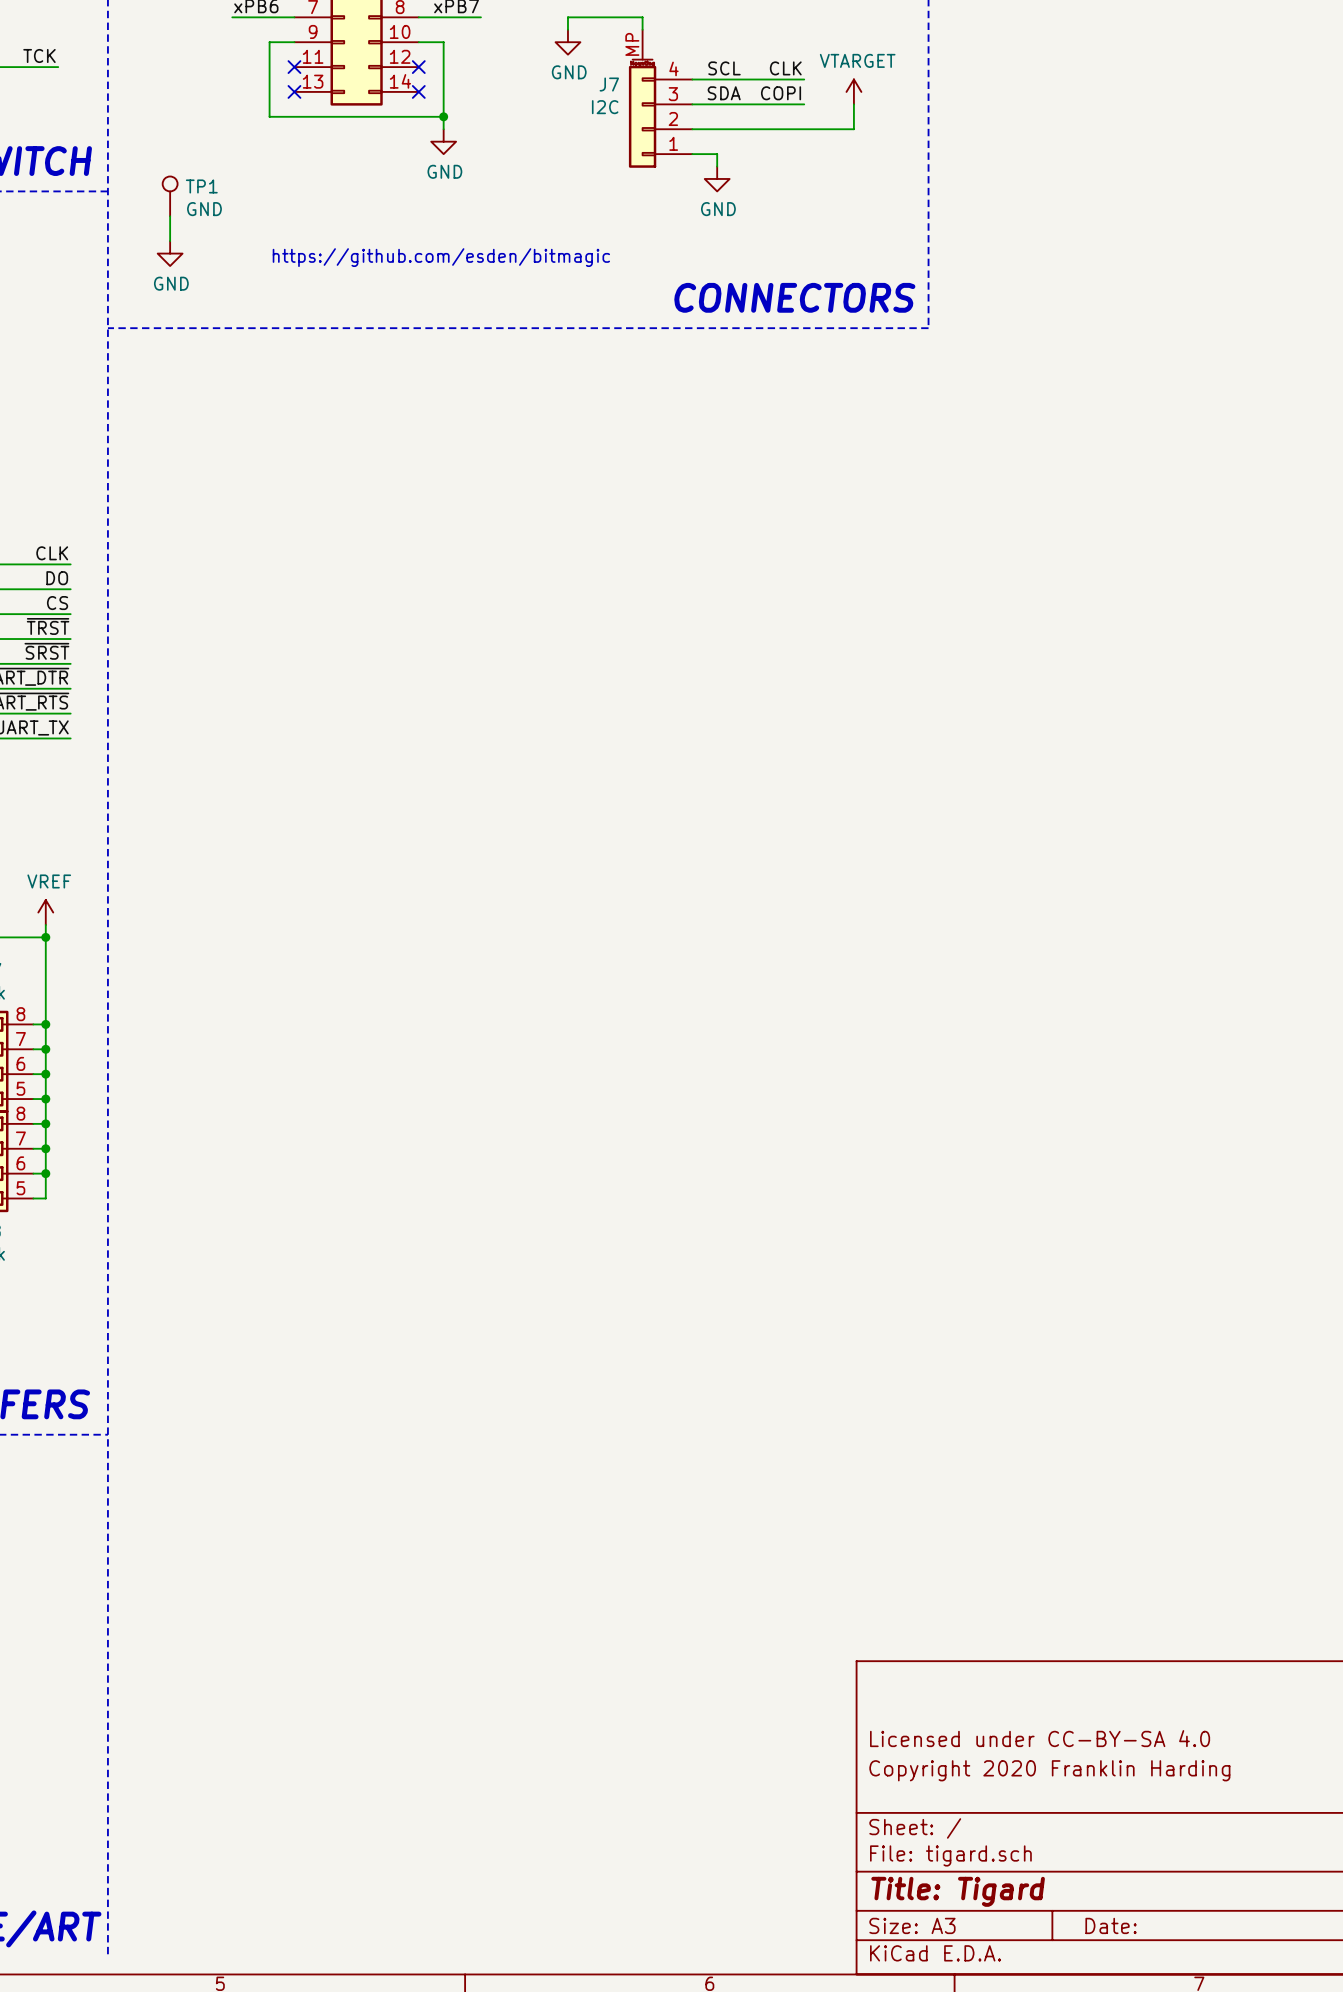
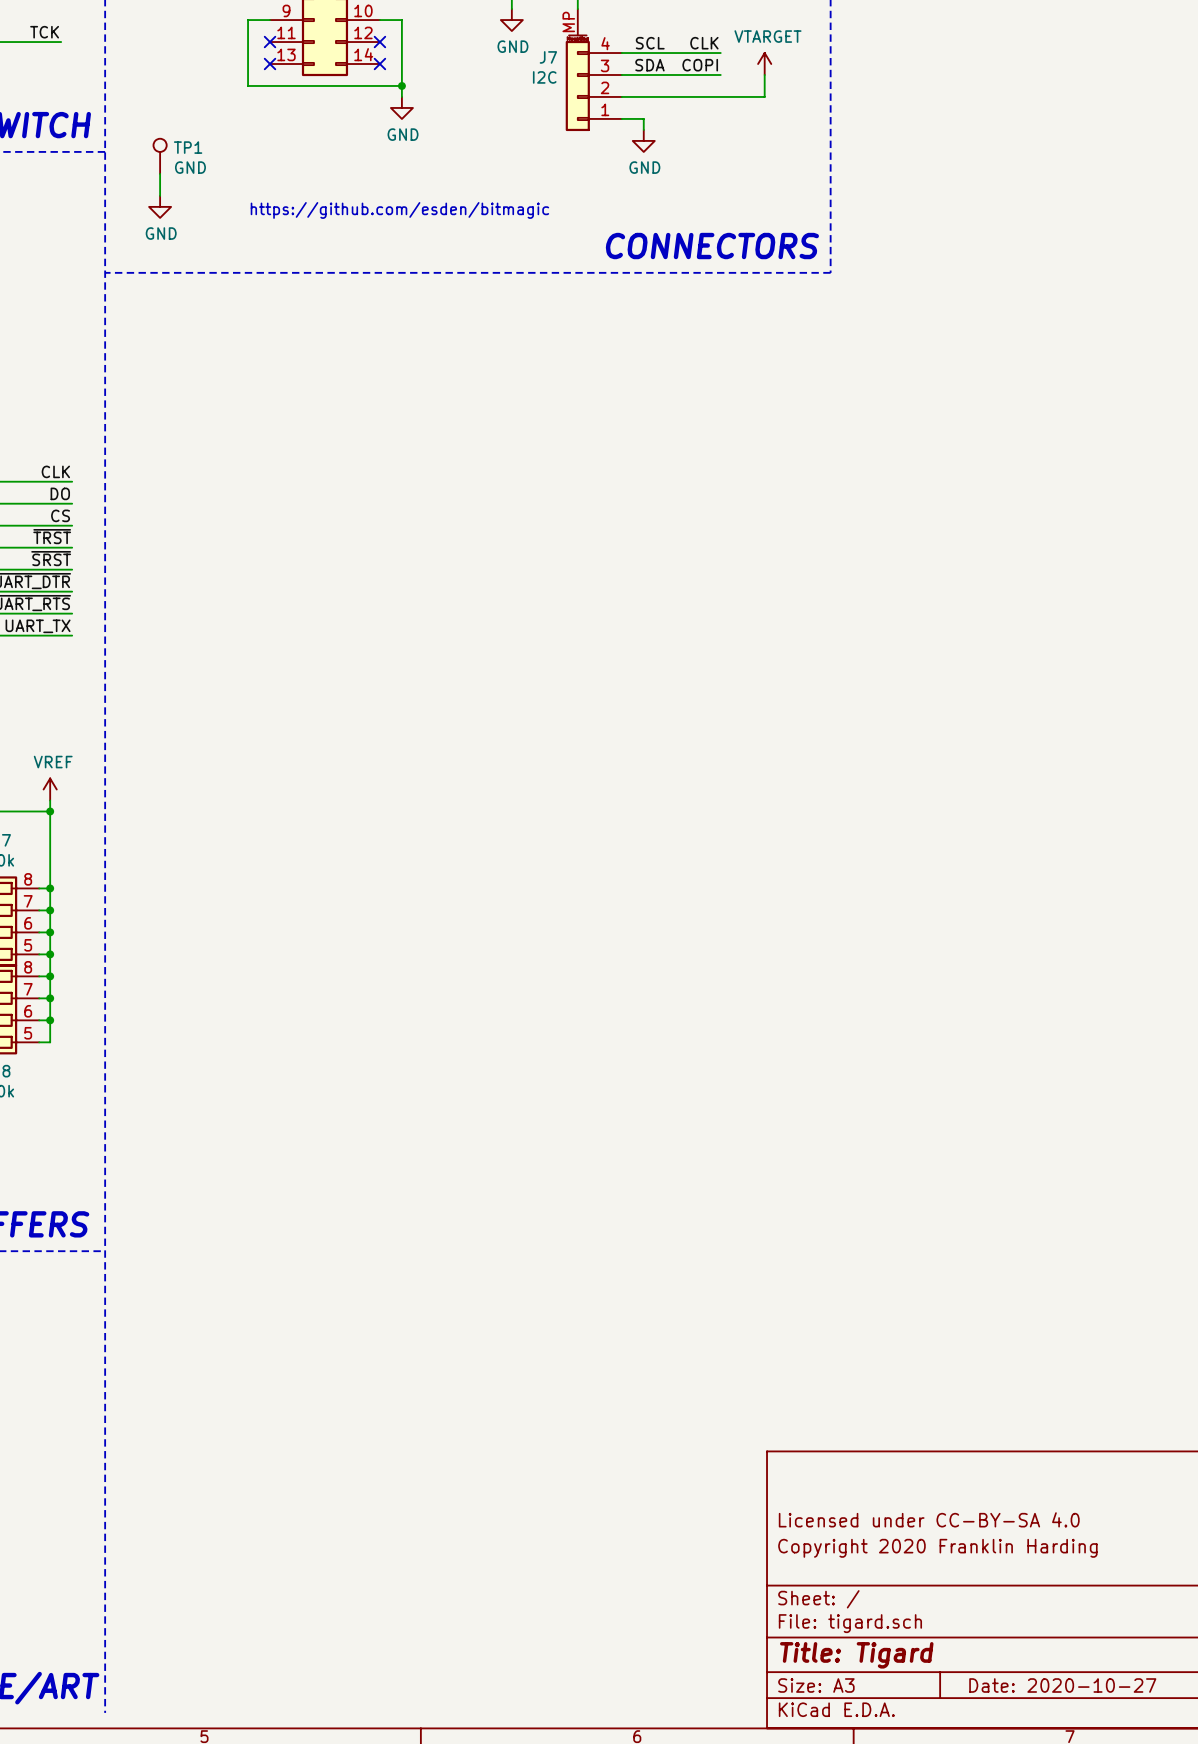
title block: Date: (1111, 1925) -> Date: 2020-10-27 (1062, 1685)

